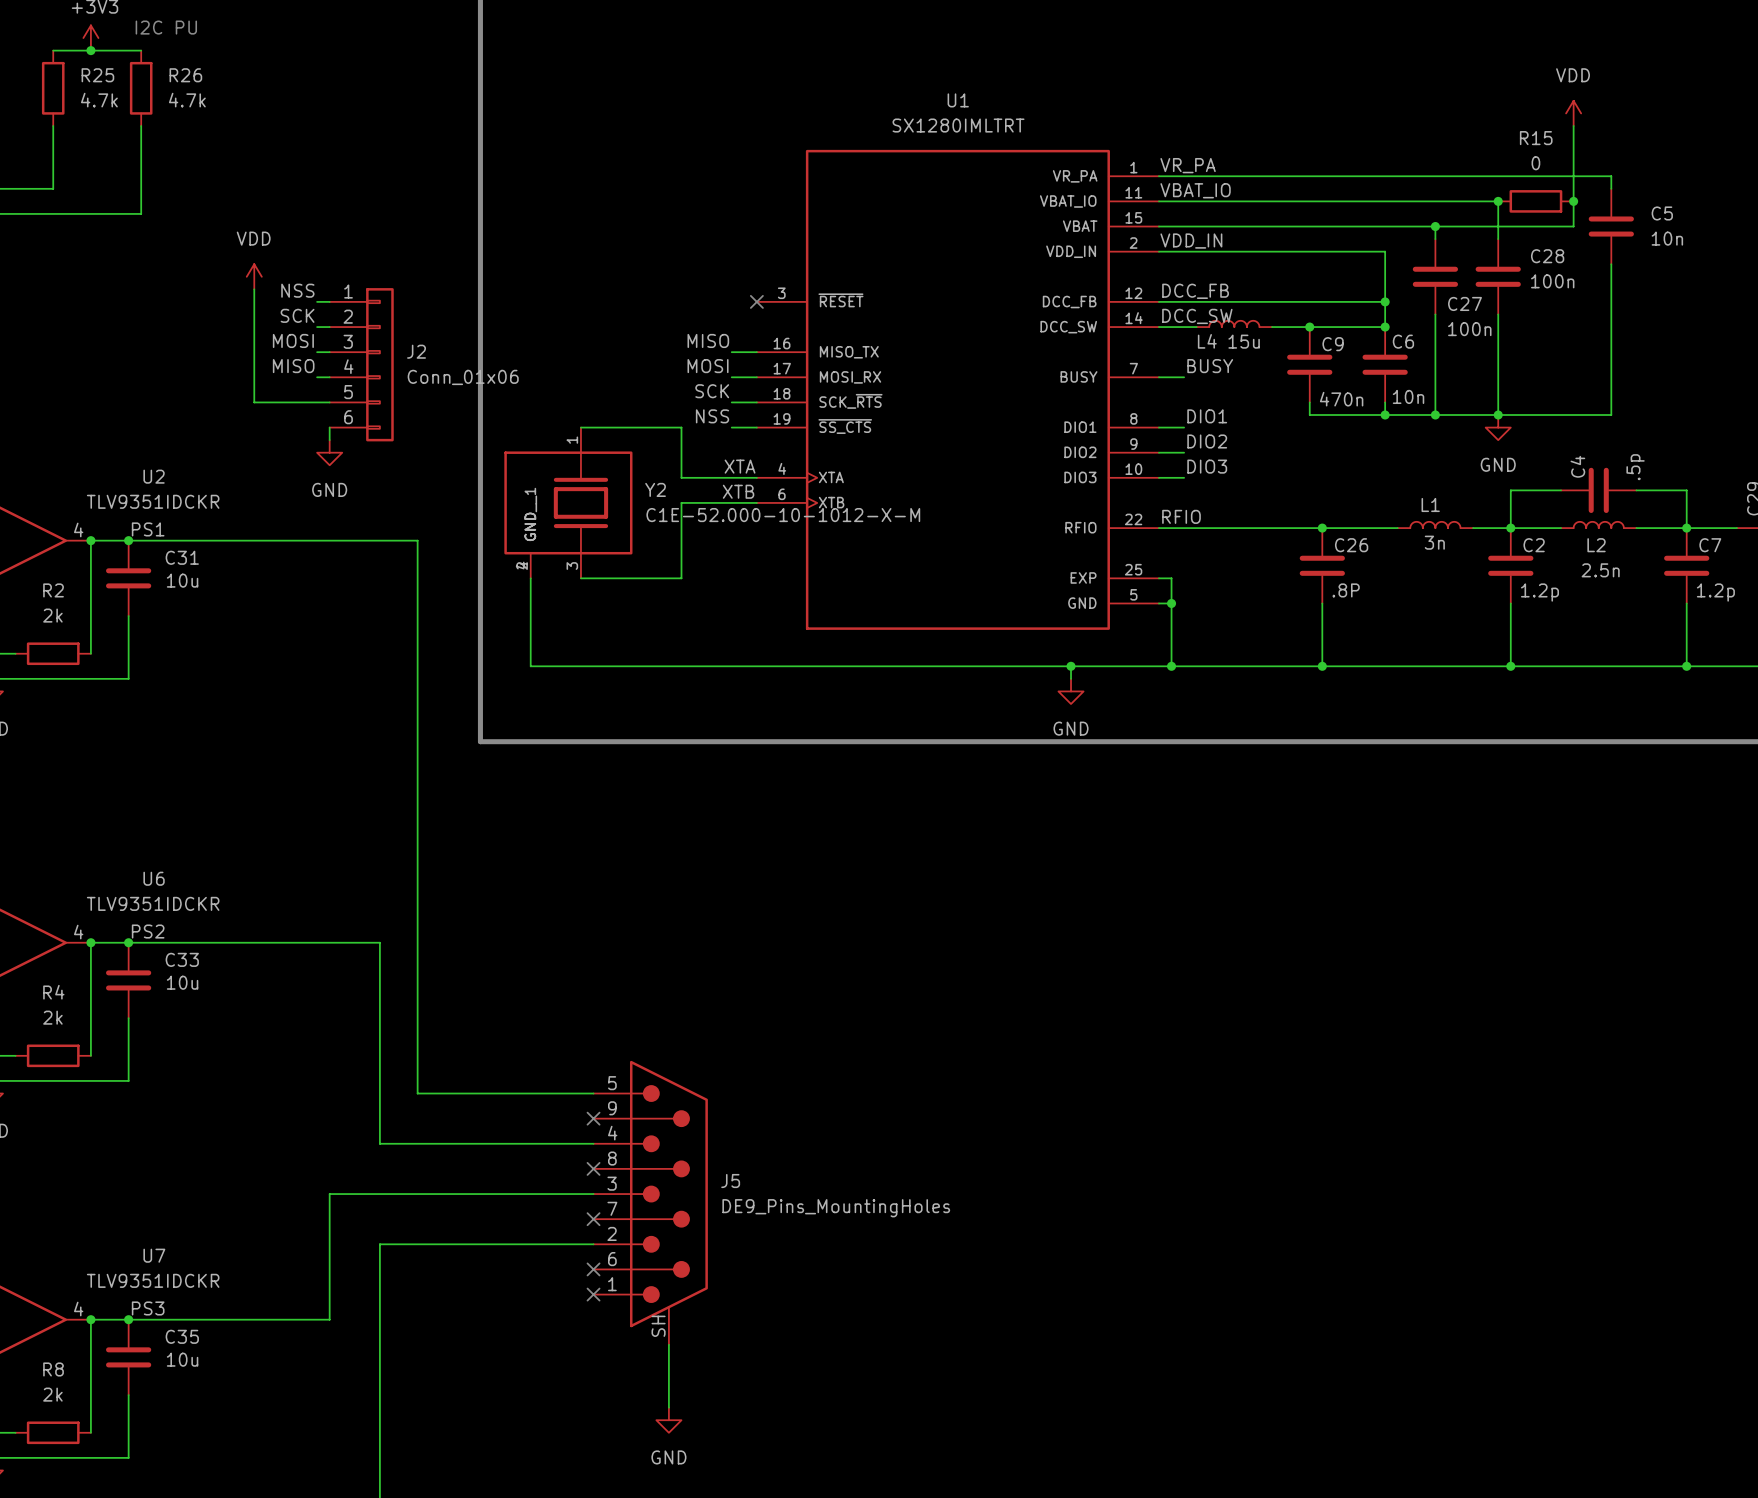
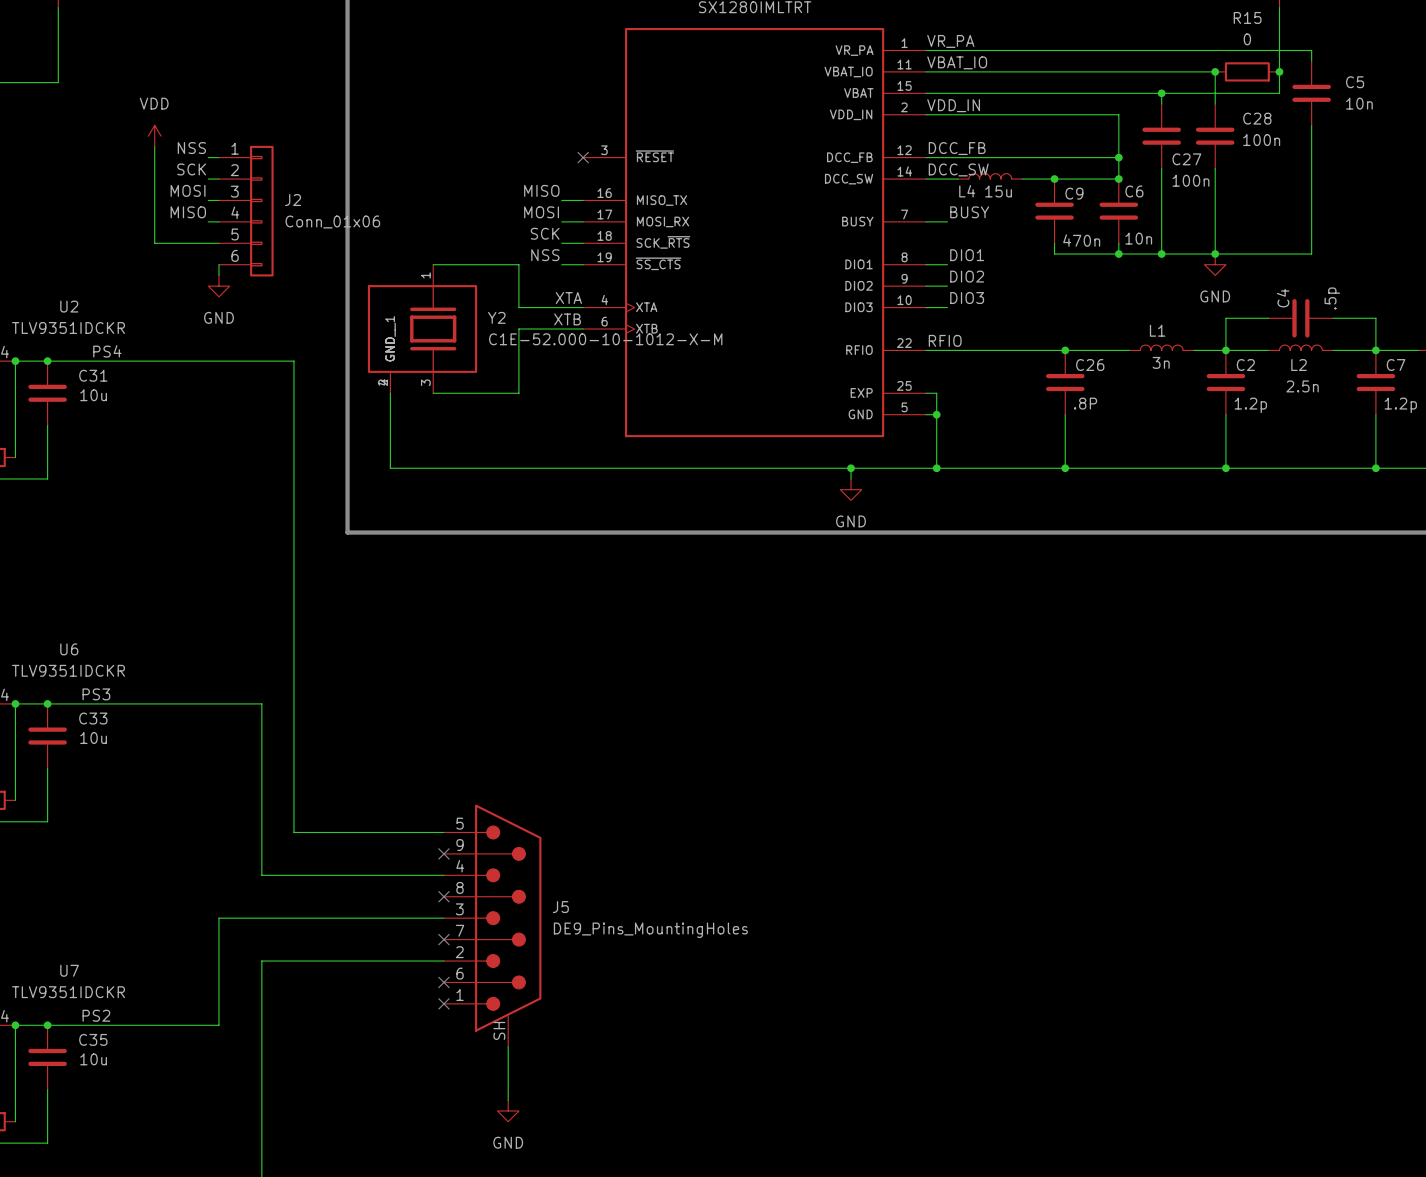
label: PS1 (148, 529) -> none
label: none -> PS4 (107, 351)
label: PS2 (148, 931) -> PS3 (96, 694)
label: PS3 (148, 1308) -> PS2 (96, 1015)

